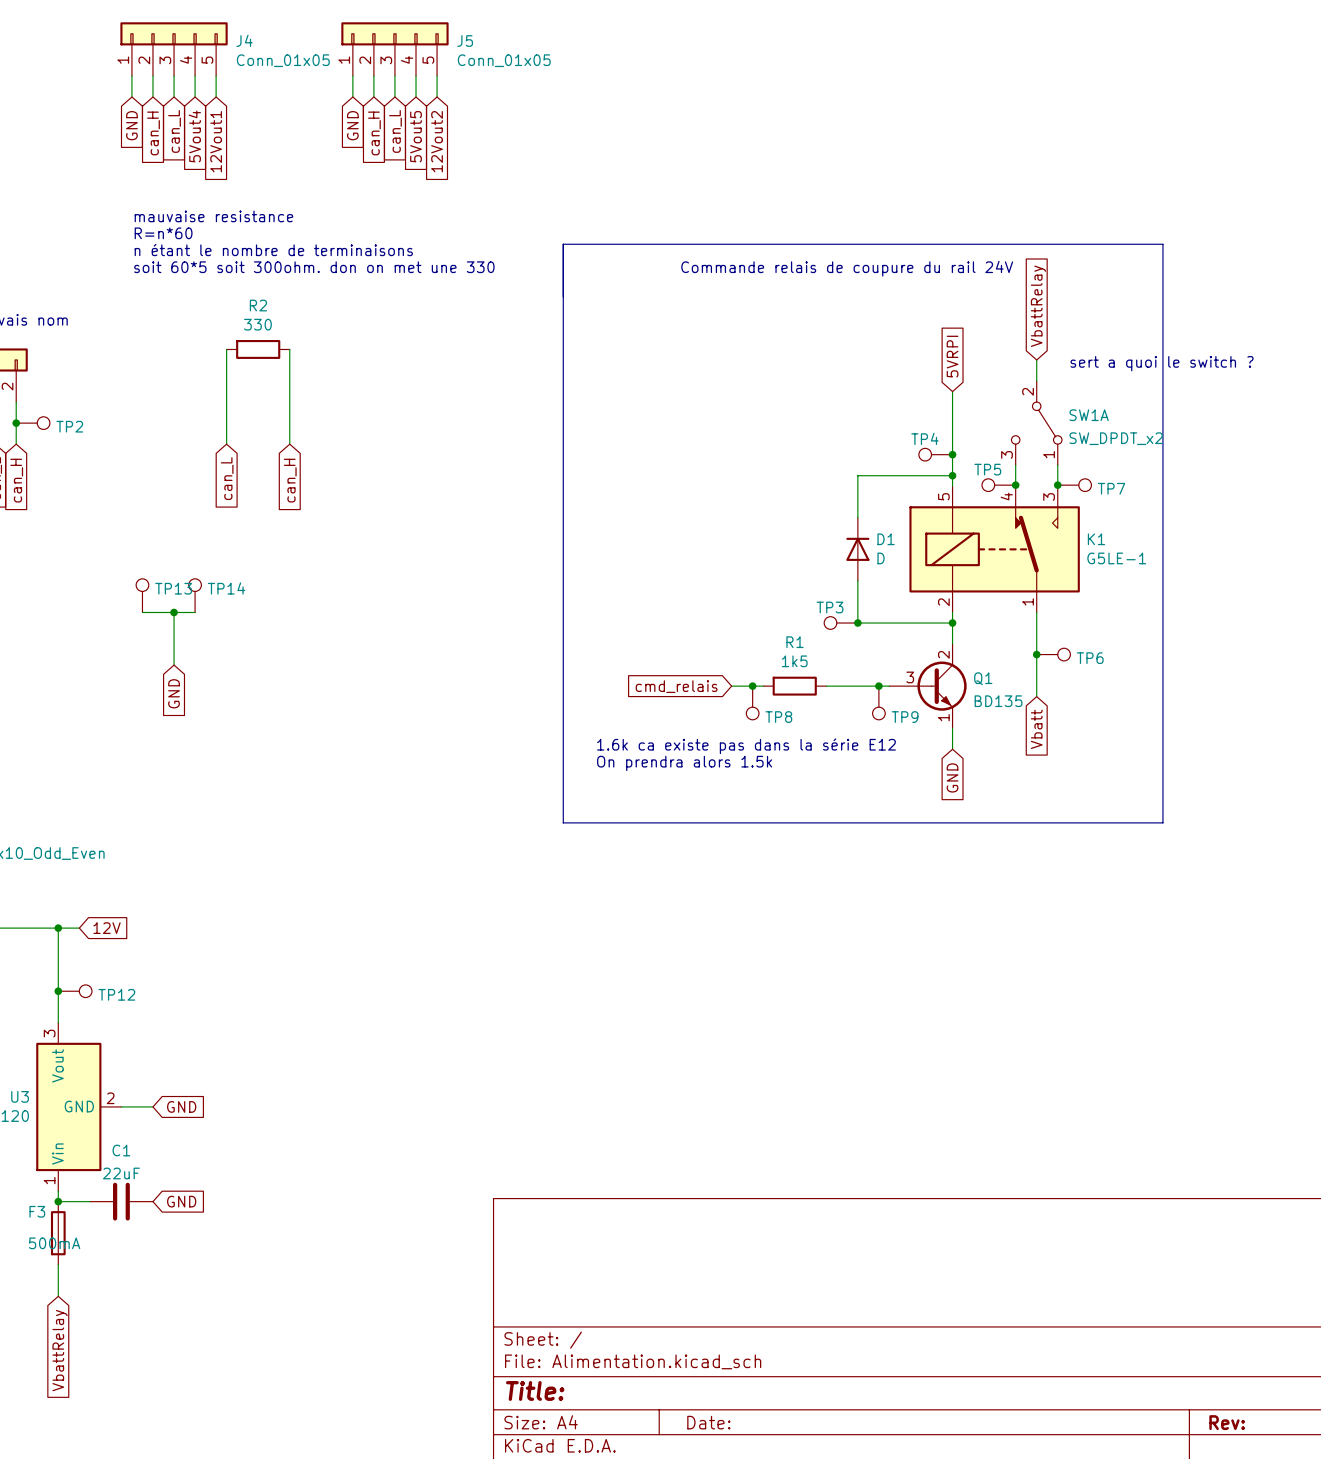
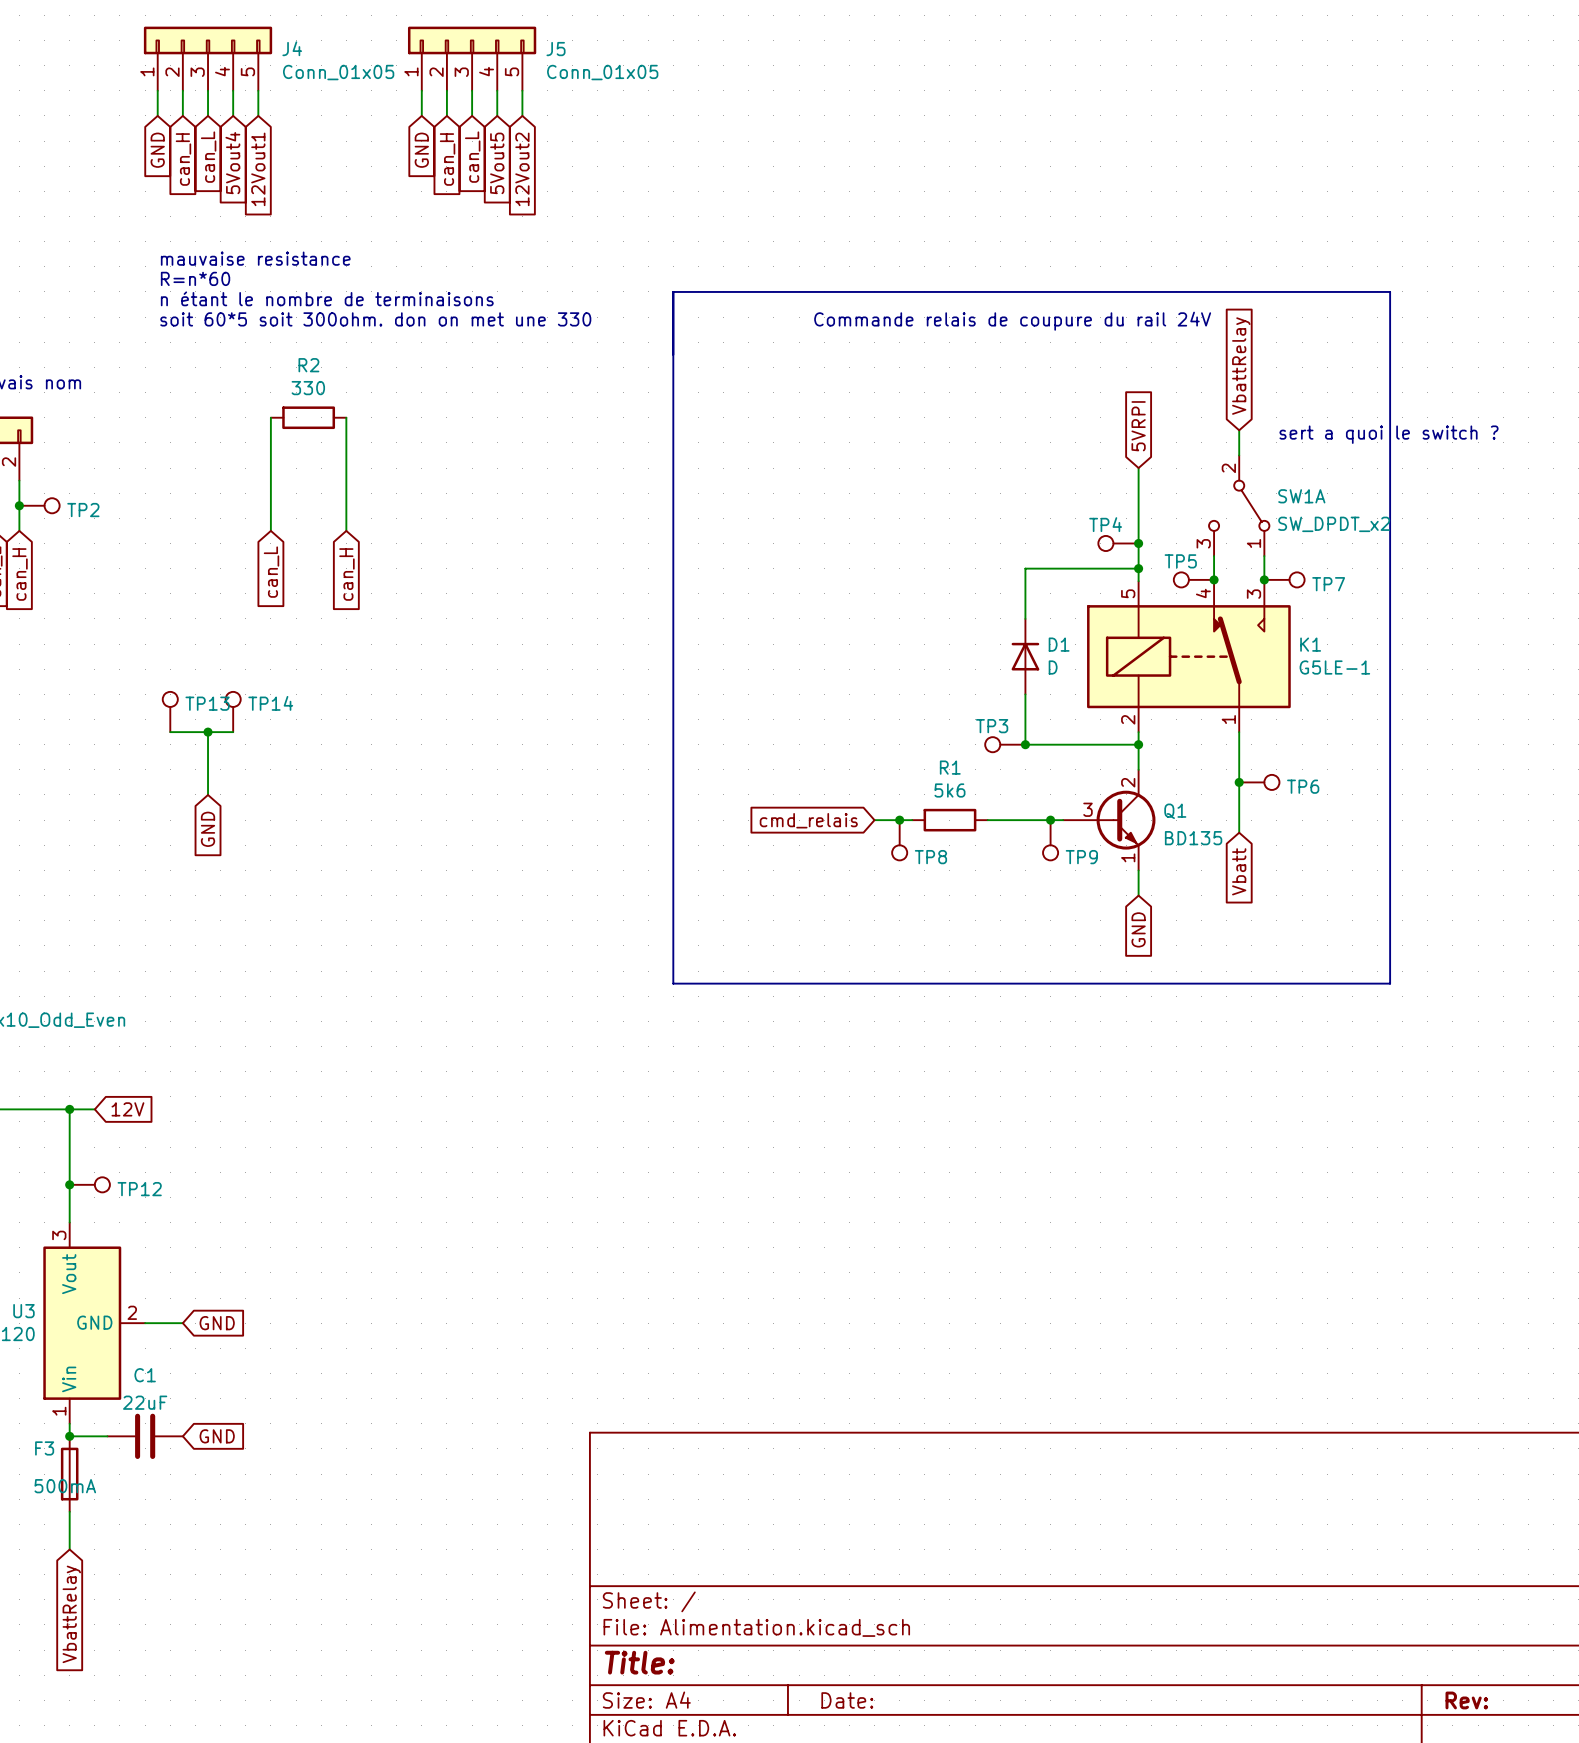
R1 value: 1k5 (794, 661) -> 5k6 (949, 790)
text: 1.6k ca existe pas dans la série E12 (746, 746) -> none
text: On prendra alors 1.5k (684, 763) -> none

